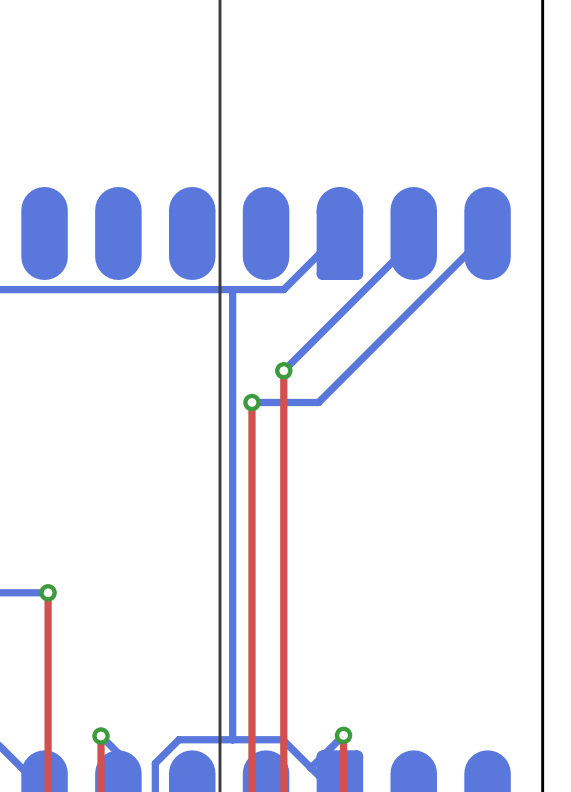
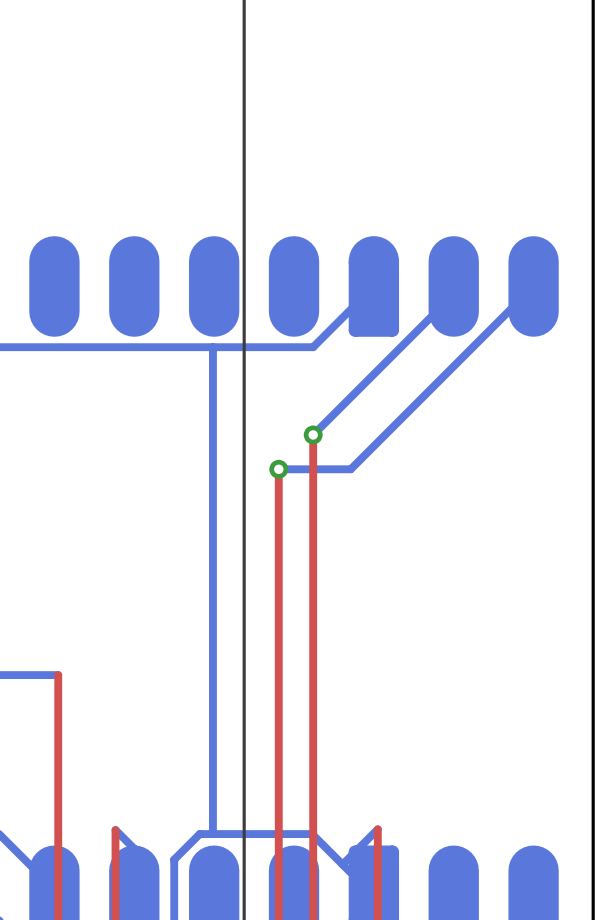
bottom track: (232, 289) (232, 739) -> (212, 347) (212, 834)
via: (48, 592) -> none
via: (343, 735) -> none
via: (101, 736) -> none

